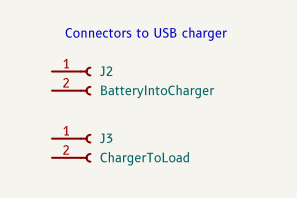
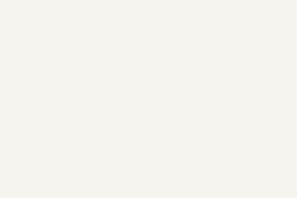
text: Connectors to USB charger (146, 34) -> none
J2: BatteryIntoCharger (71, 81) -> none
J3: ChargerToLoad (71, 148) -> none

